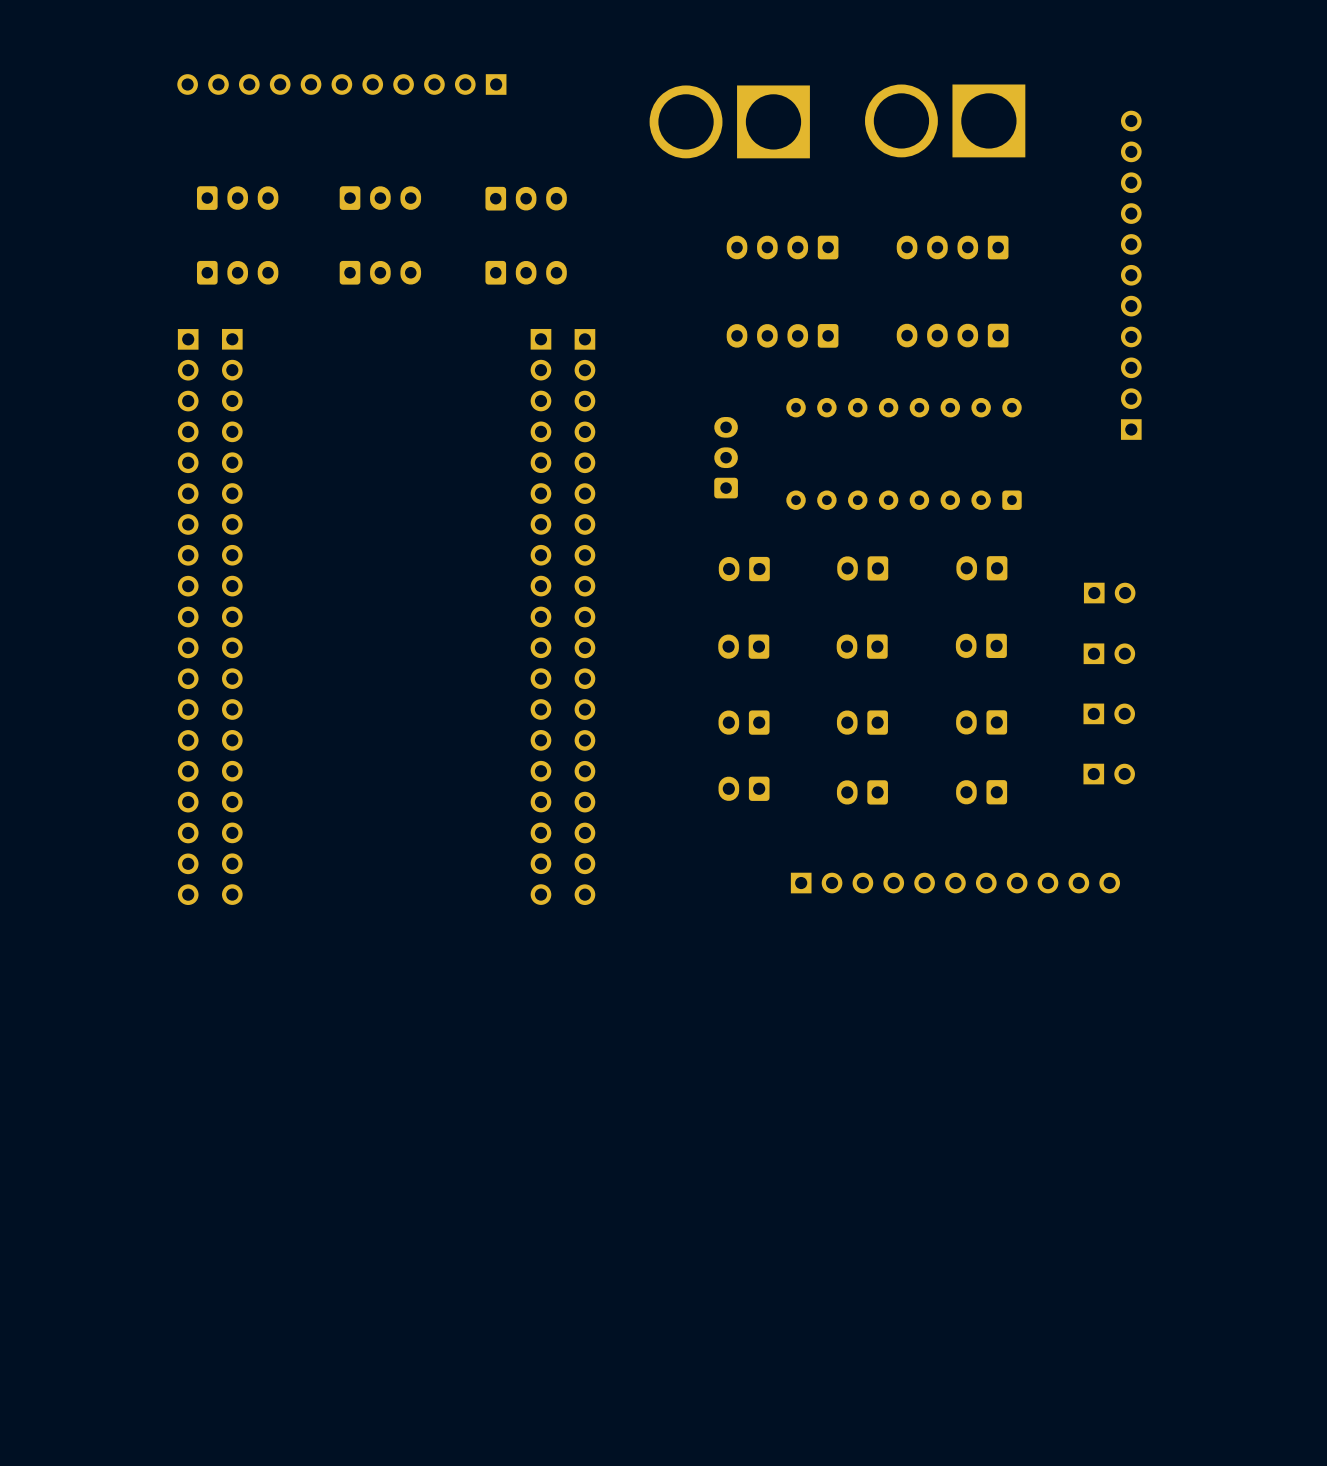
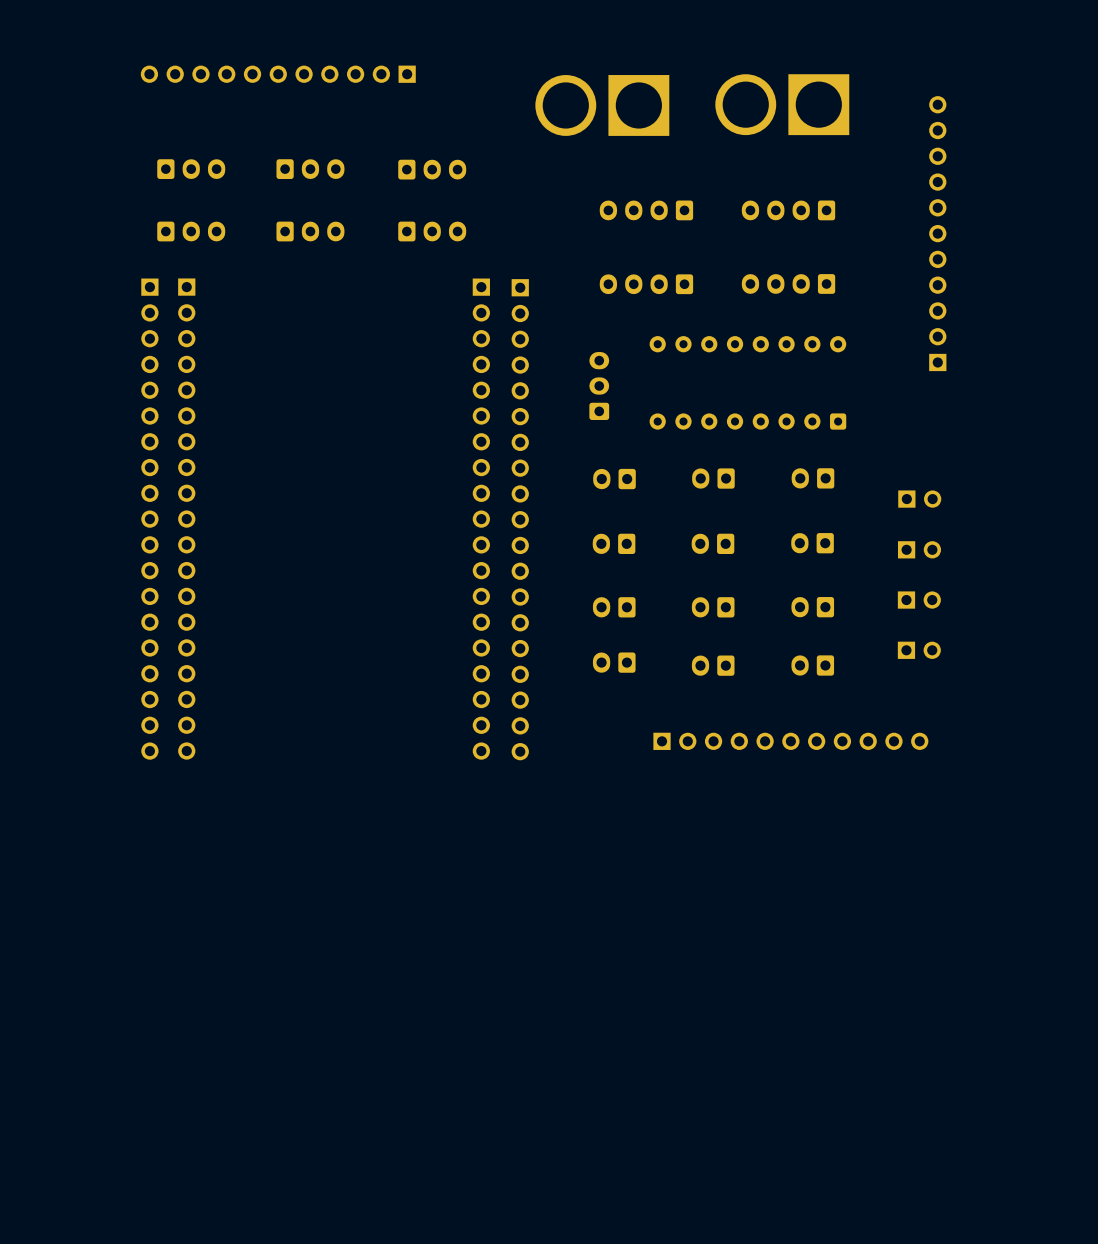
part position: (540, 616) -> (520, 519)

